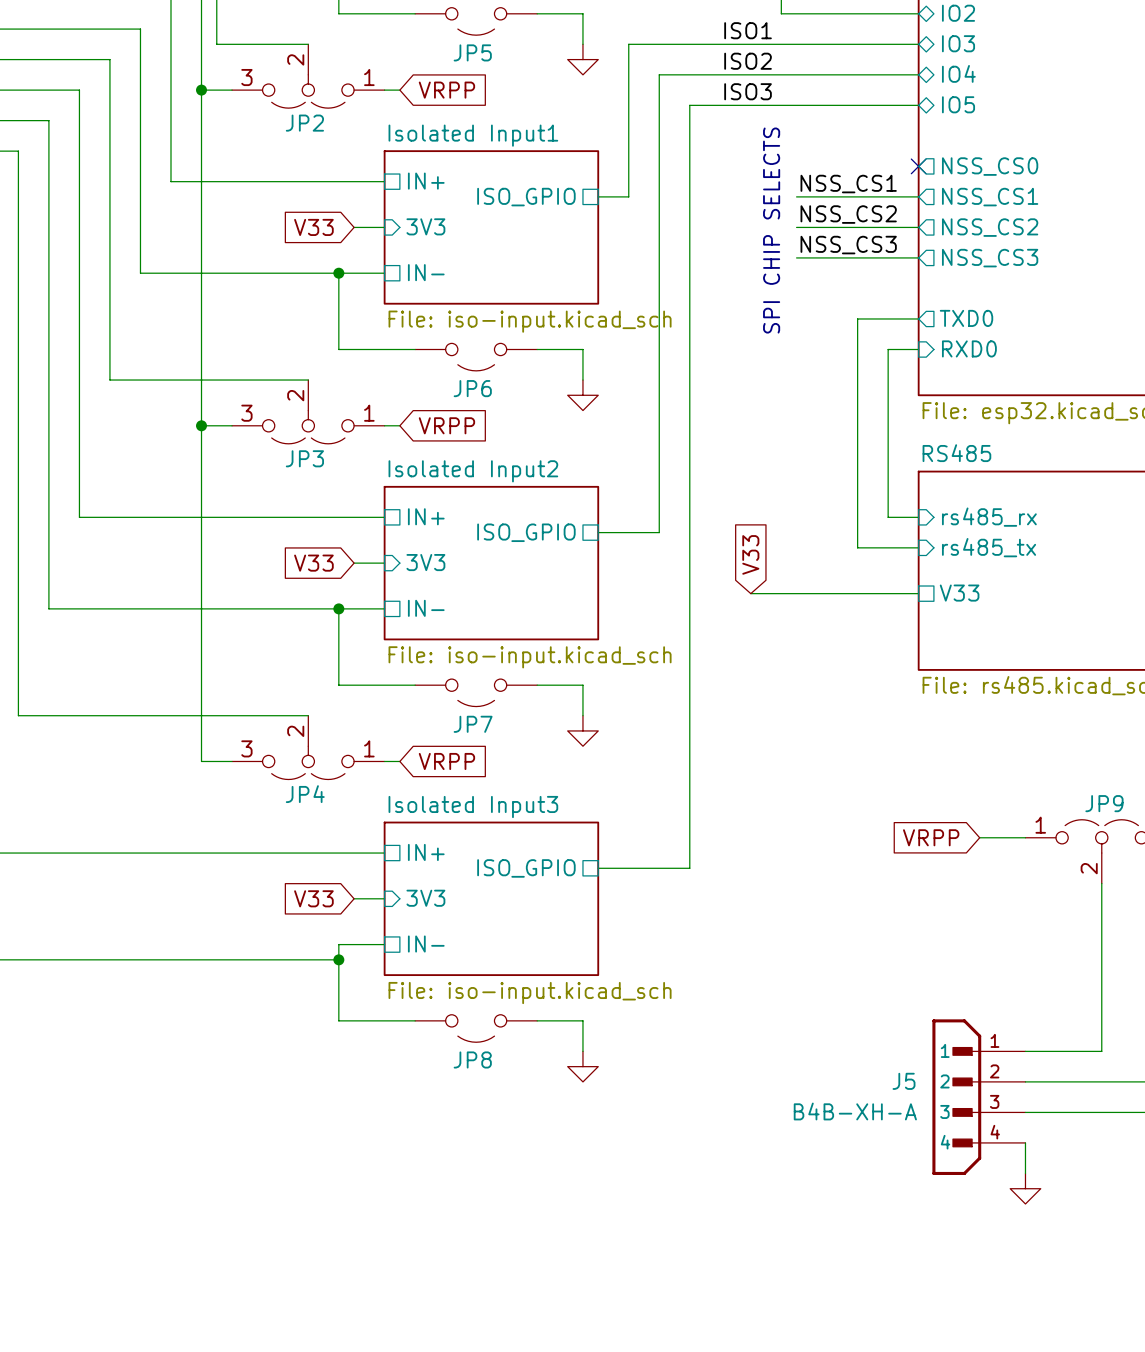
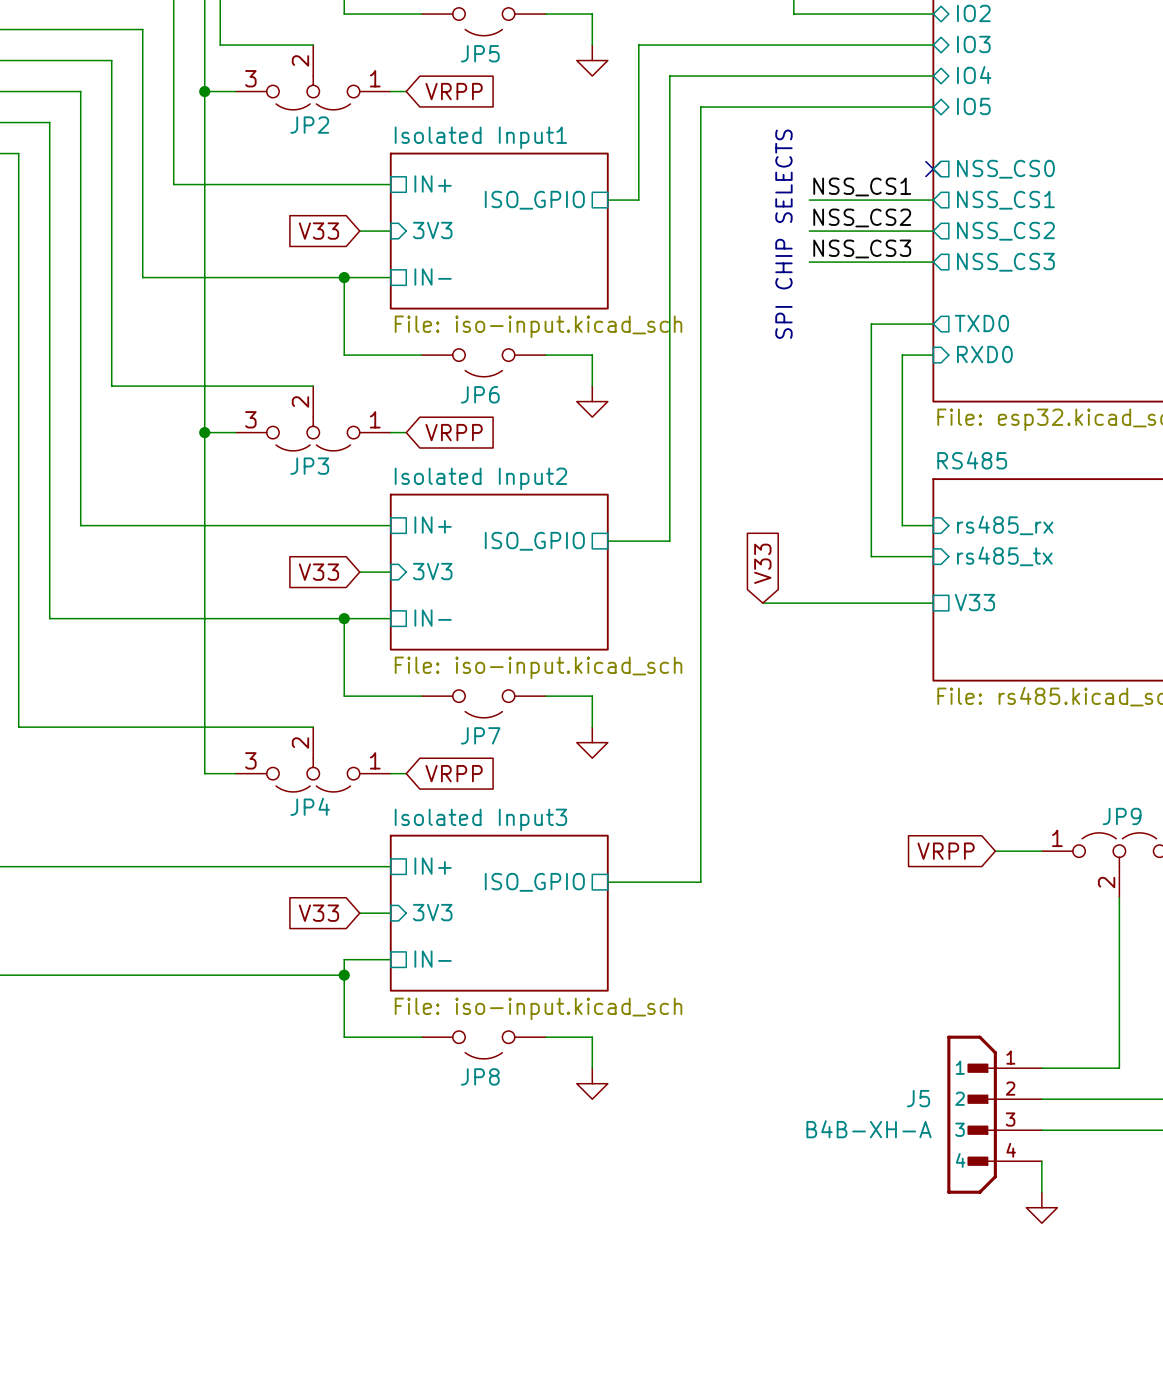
label: ISO1 (748, 30) -> none
label: ISO2 (748, 61) -> none
label: ISO3 (748, 91) -> none

